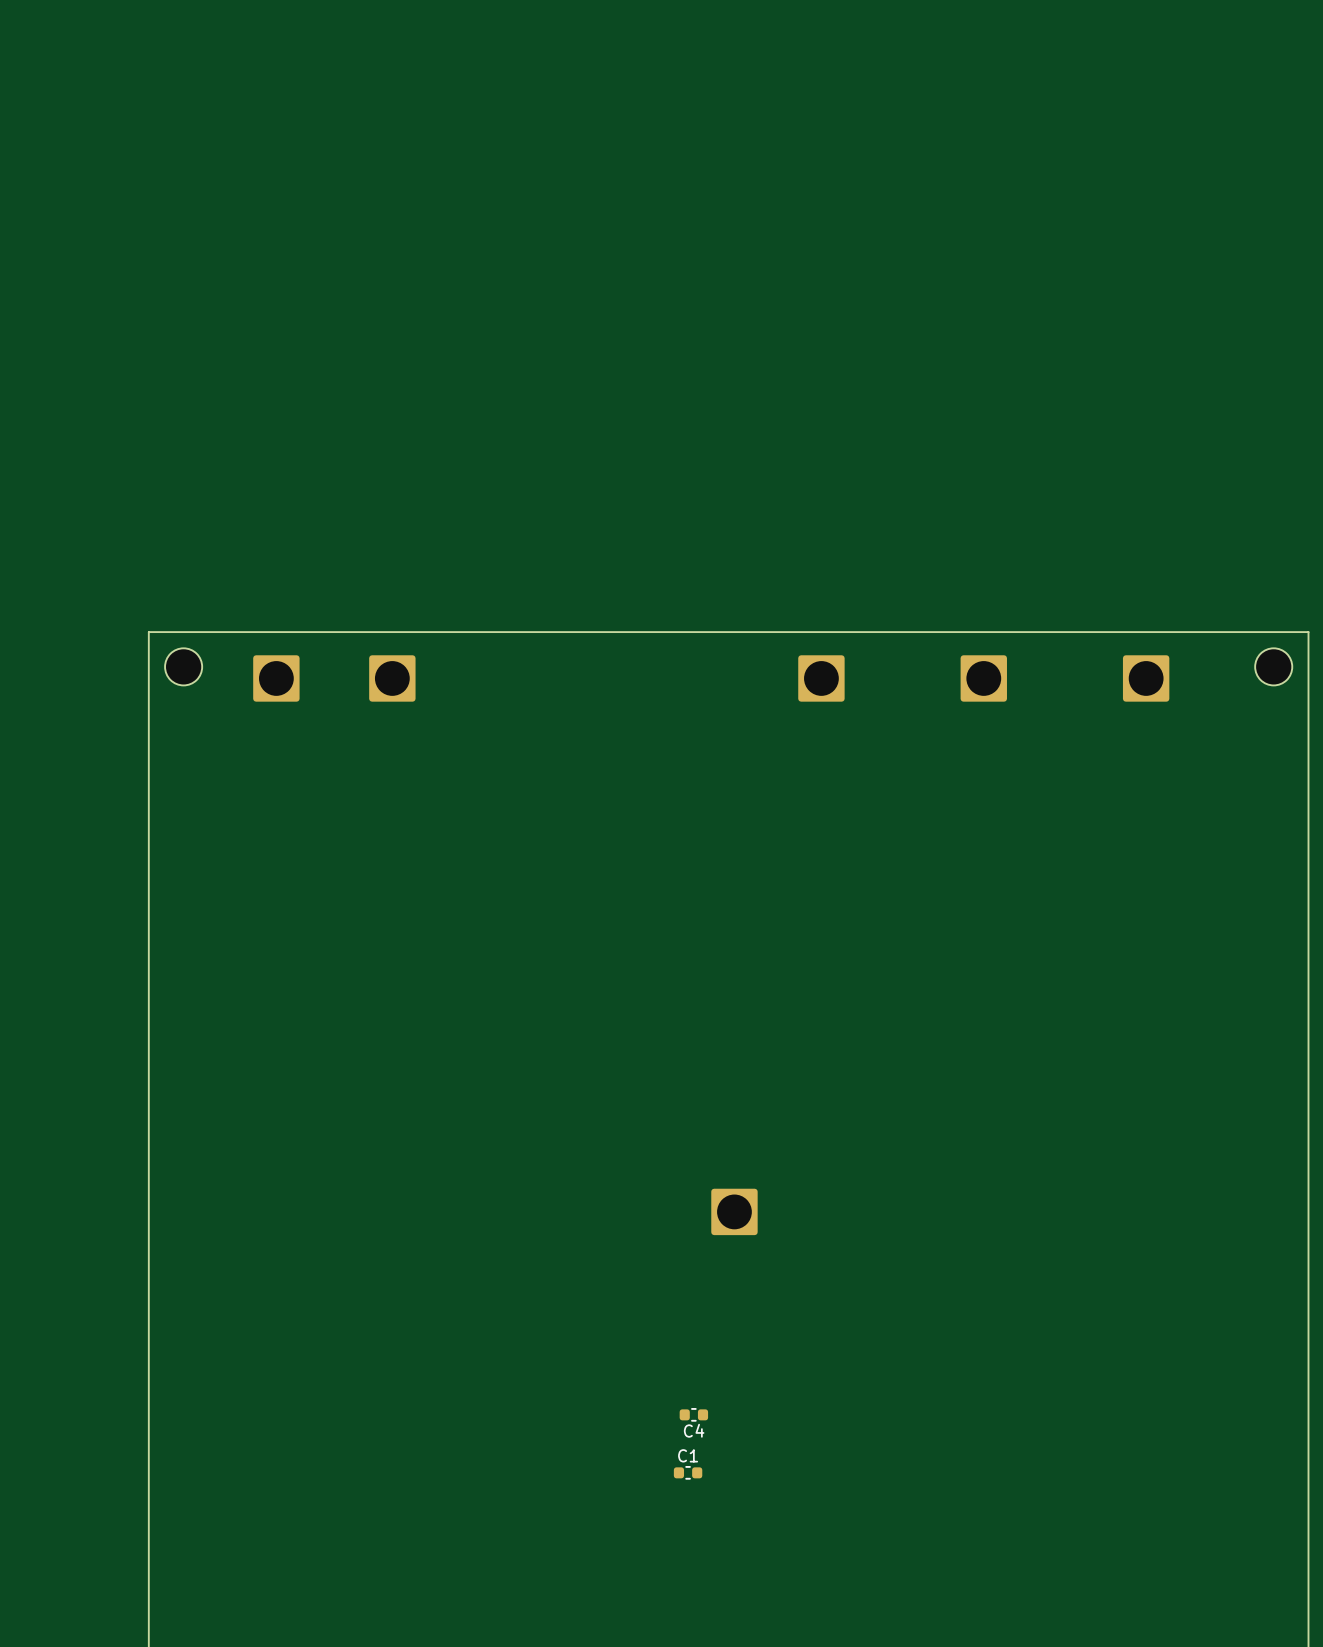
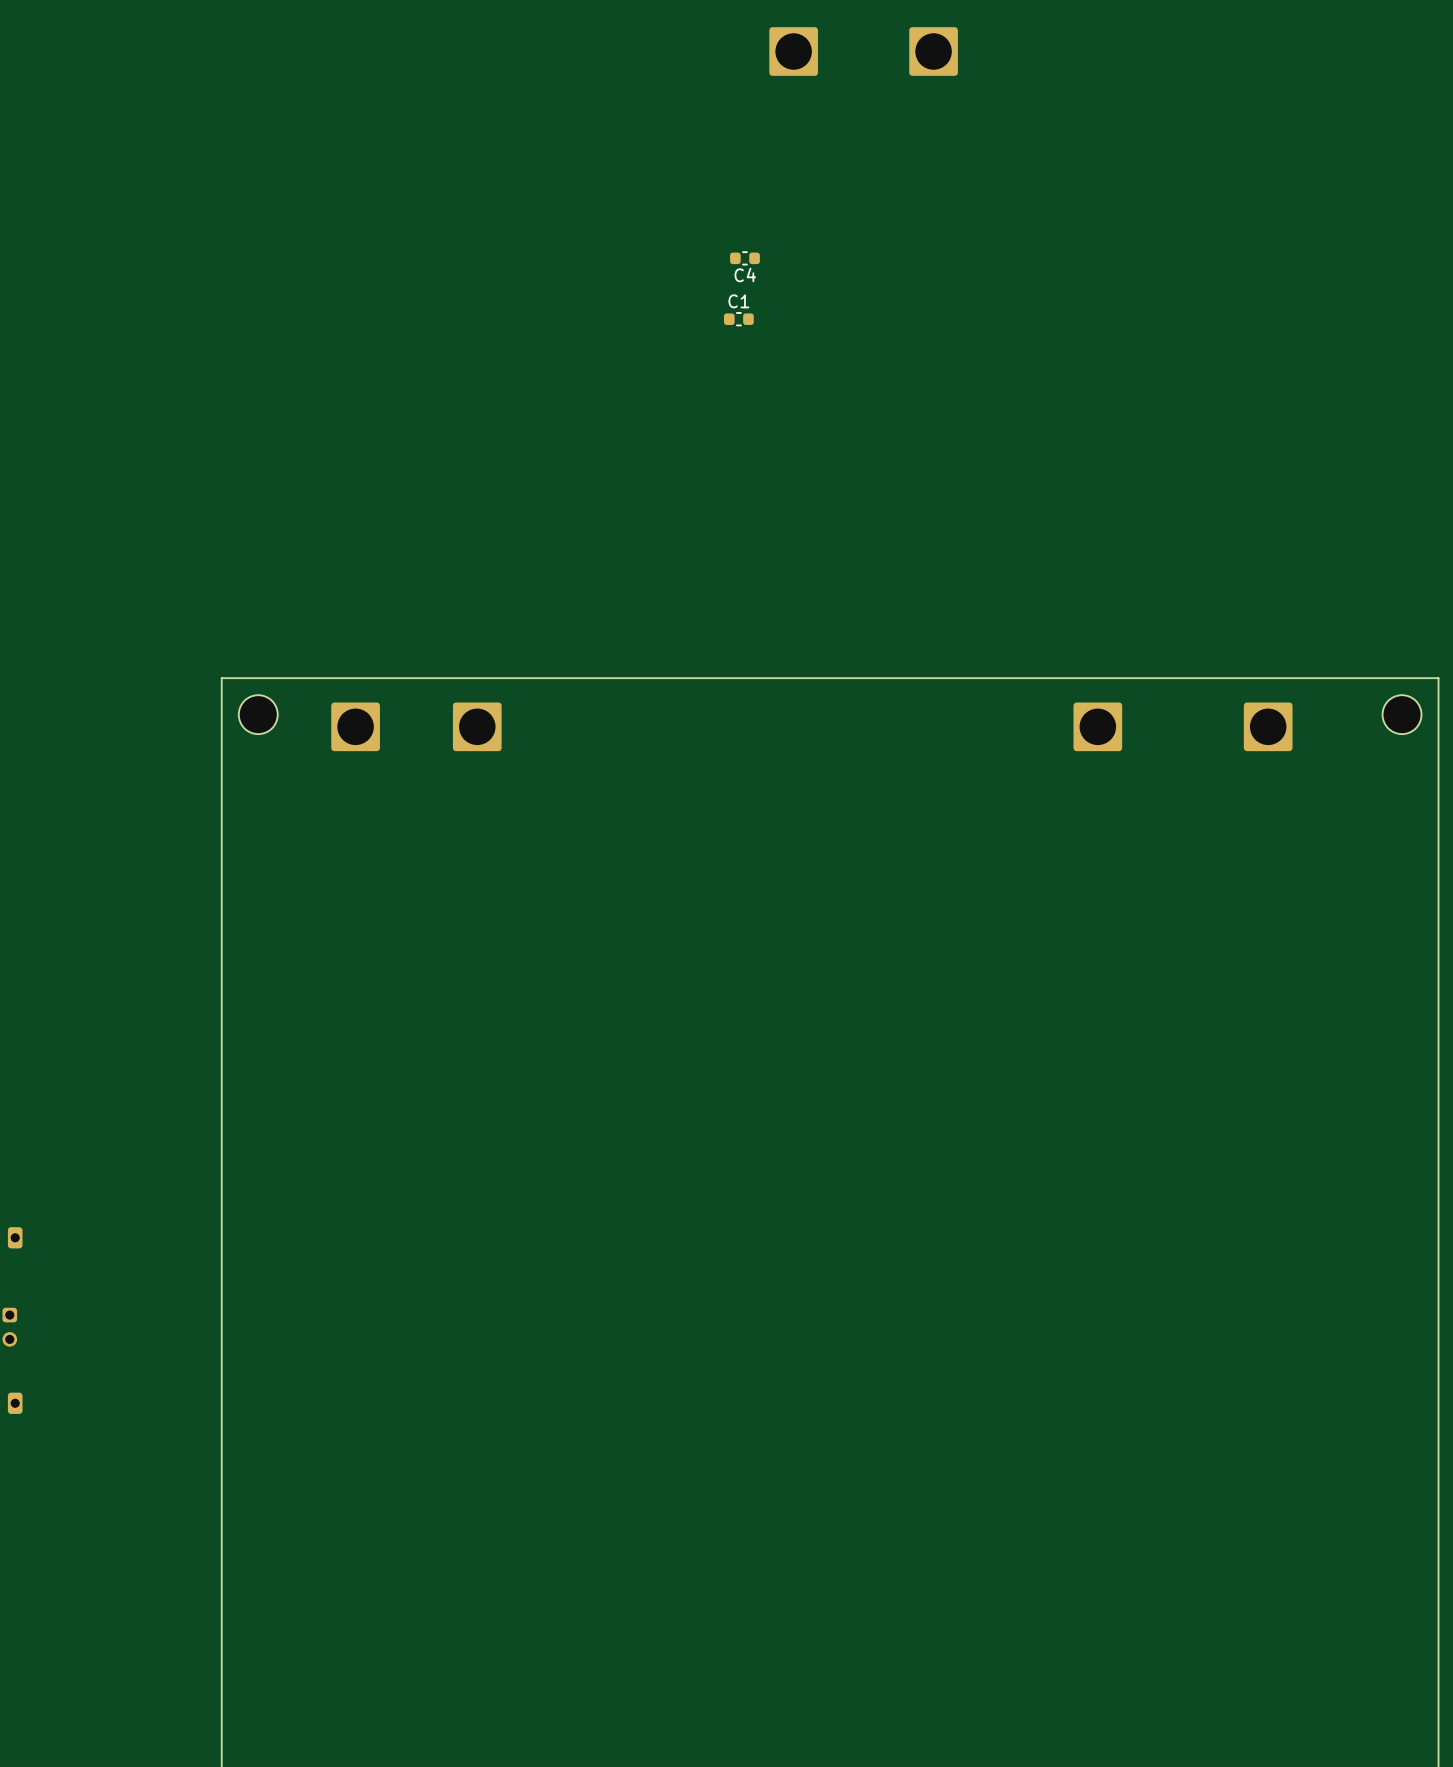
part: none -> (793, 51)
part: none -> (933, 51)
part: (821, 678) -> none
part: (734, 1211) -> none
C4 position: (693, 1414) -> (744, 258)
C1 position: (688, 1472) -> (738, 319)

